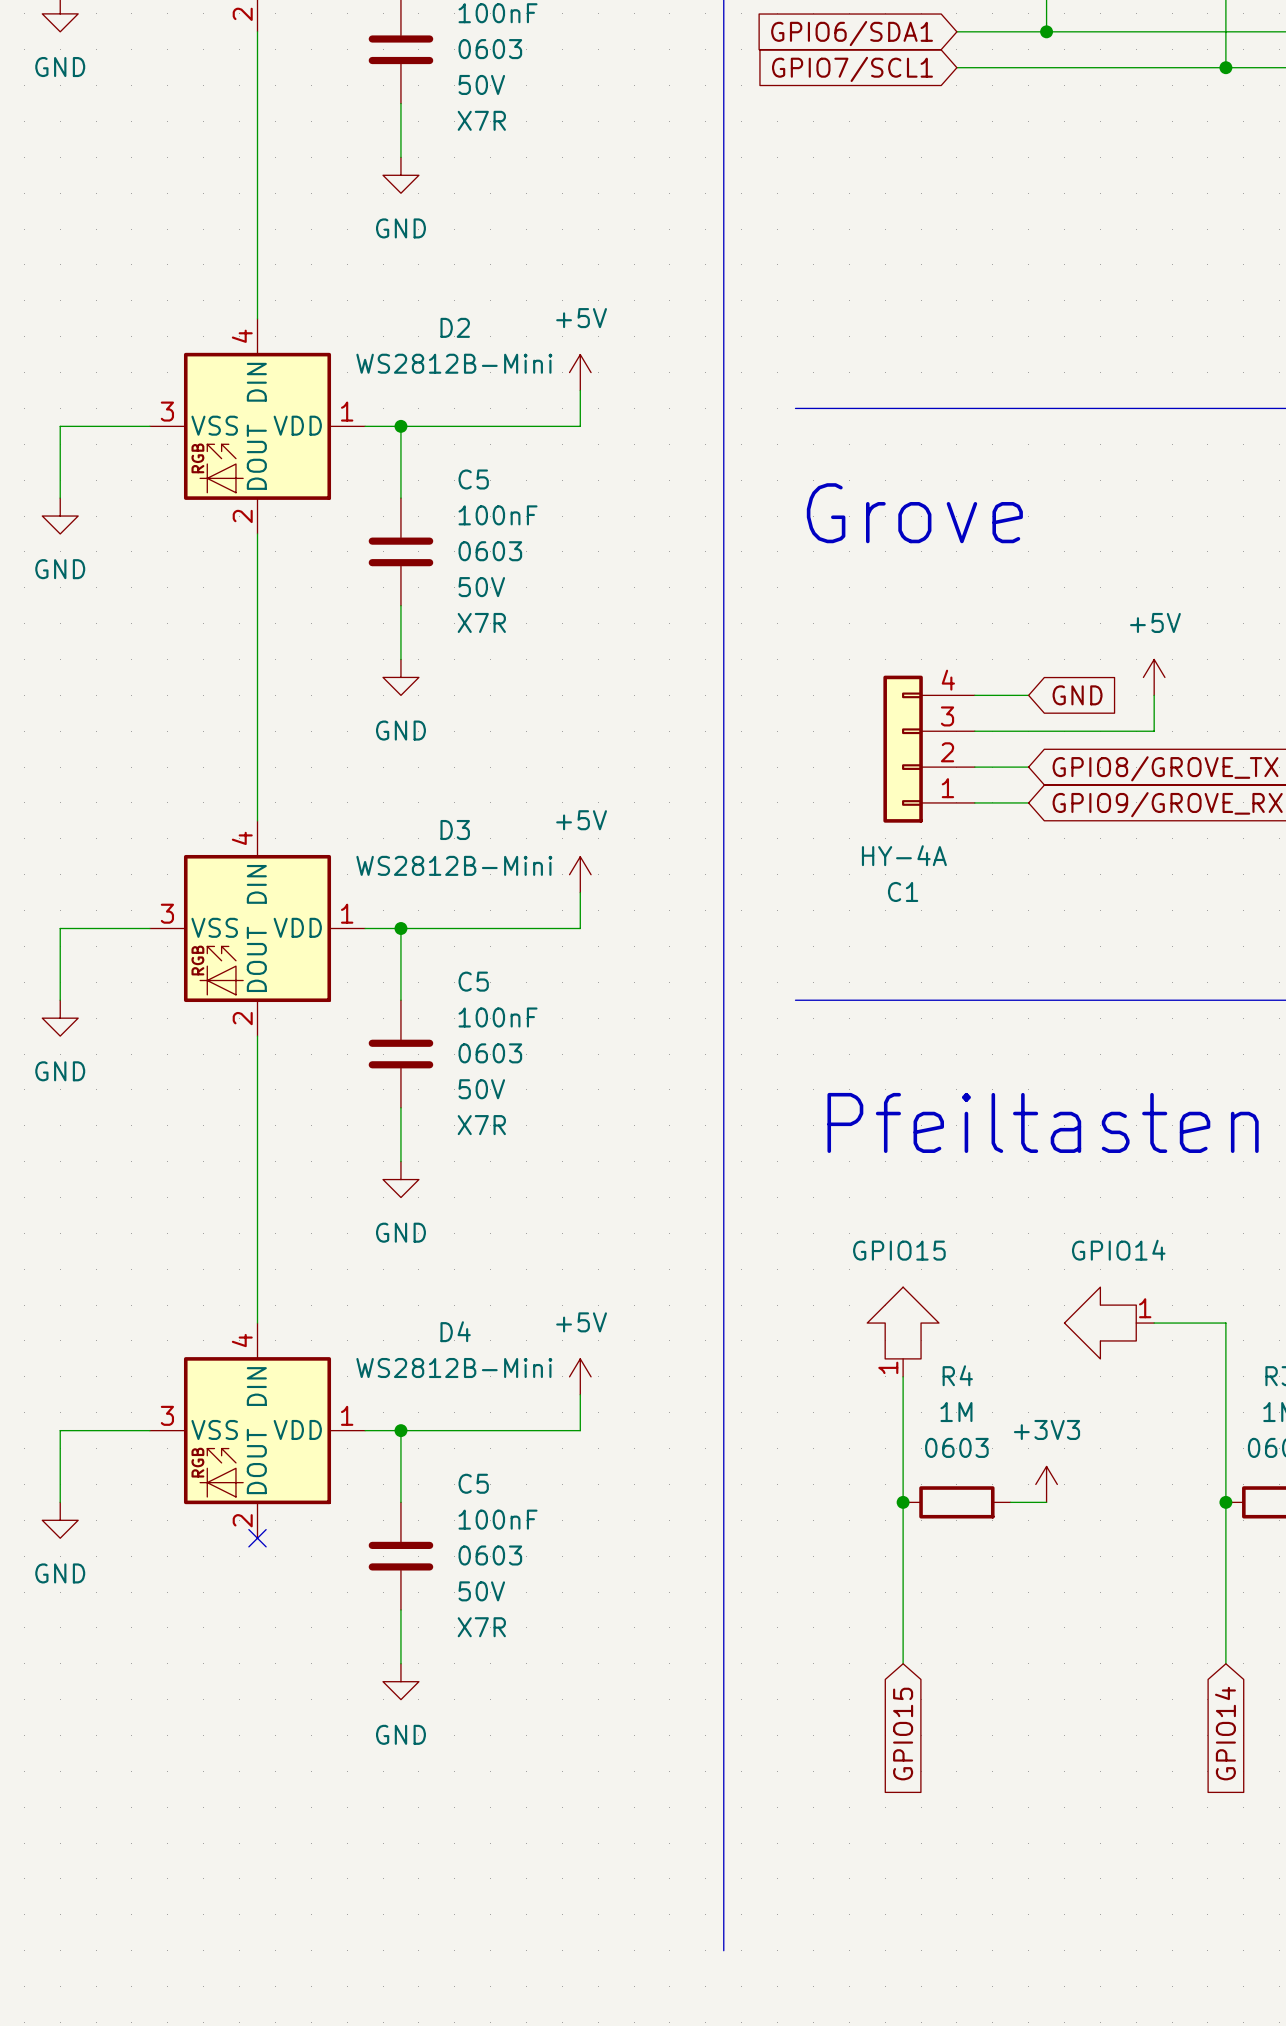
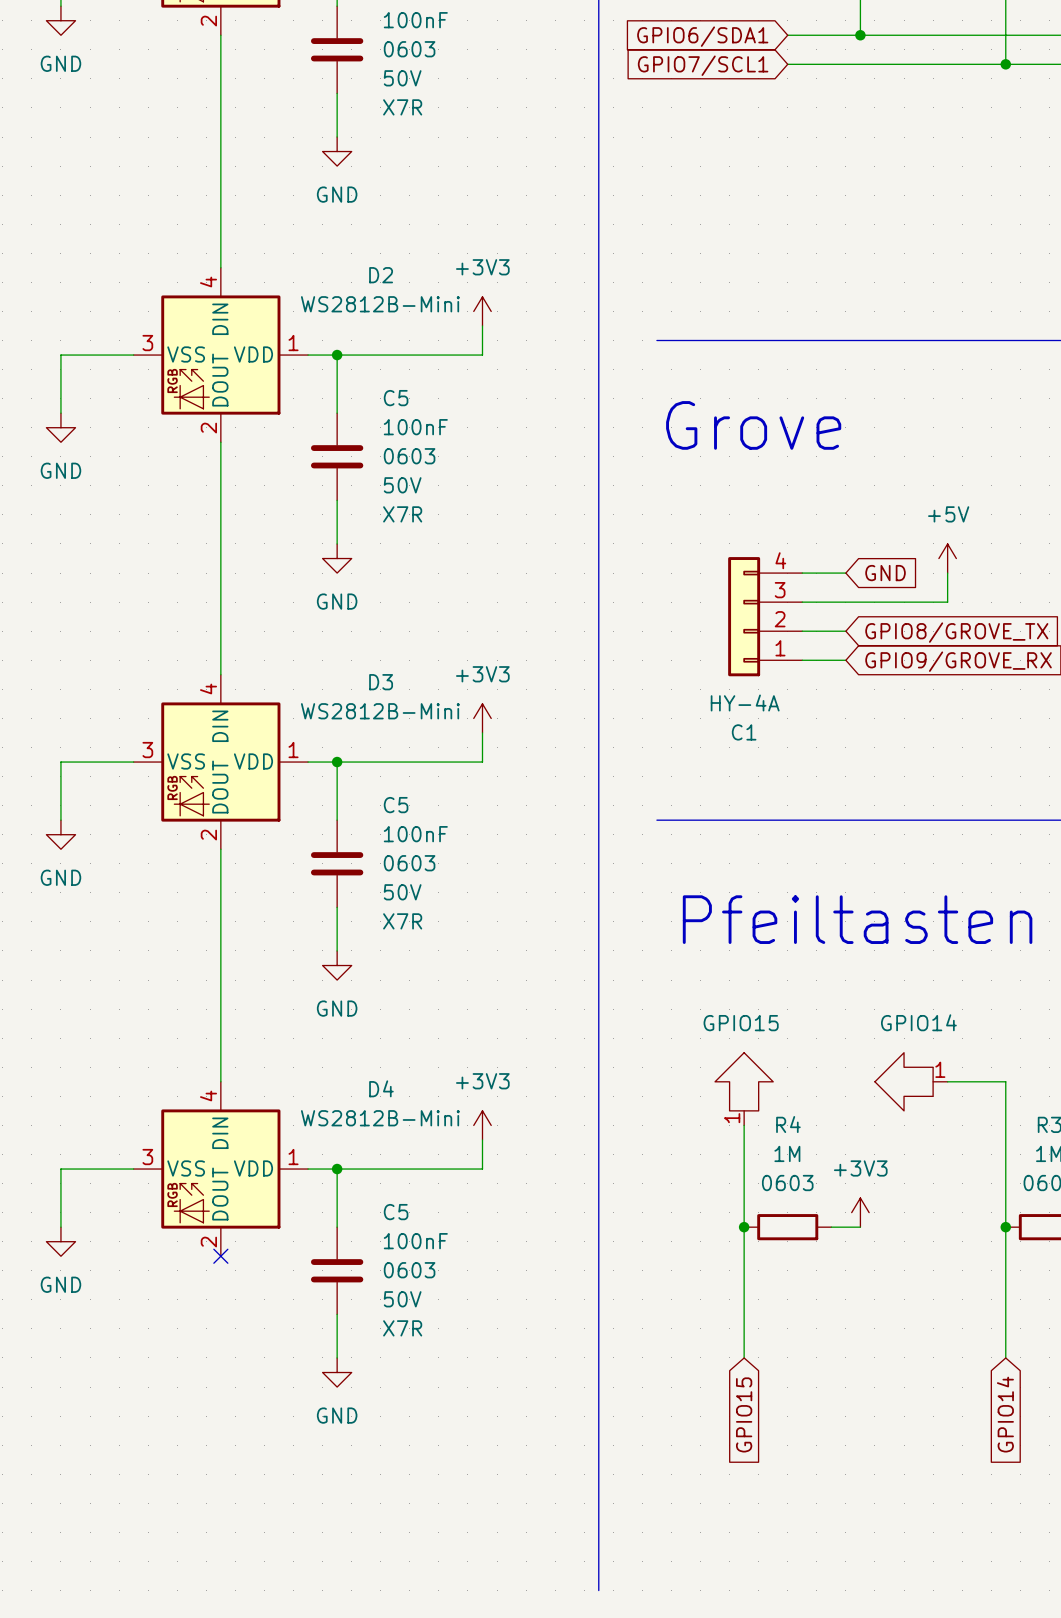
power symbol: +5V (580, 372) -> +3V3 (482, 311)
power symbol: +5V (580, 874) -> +3V3 (482, 718)
power symbol: +5V (580, 1376) -> +3V3 (482, 1125)

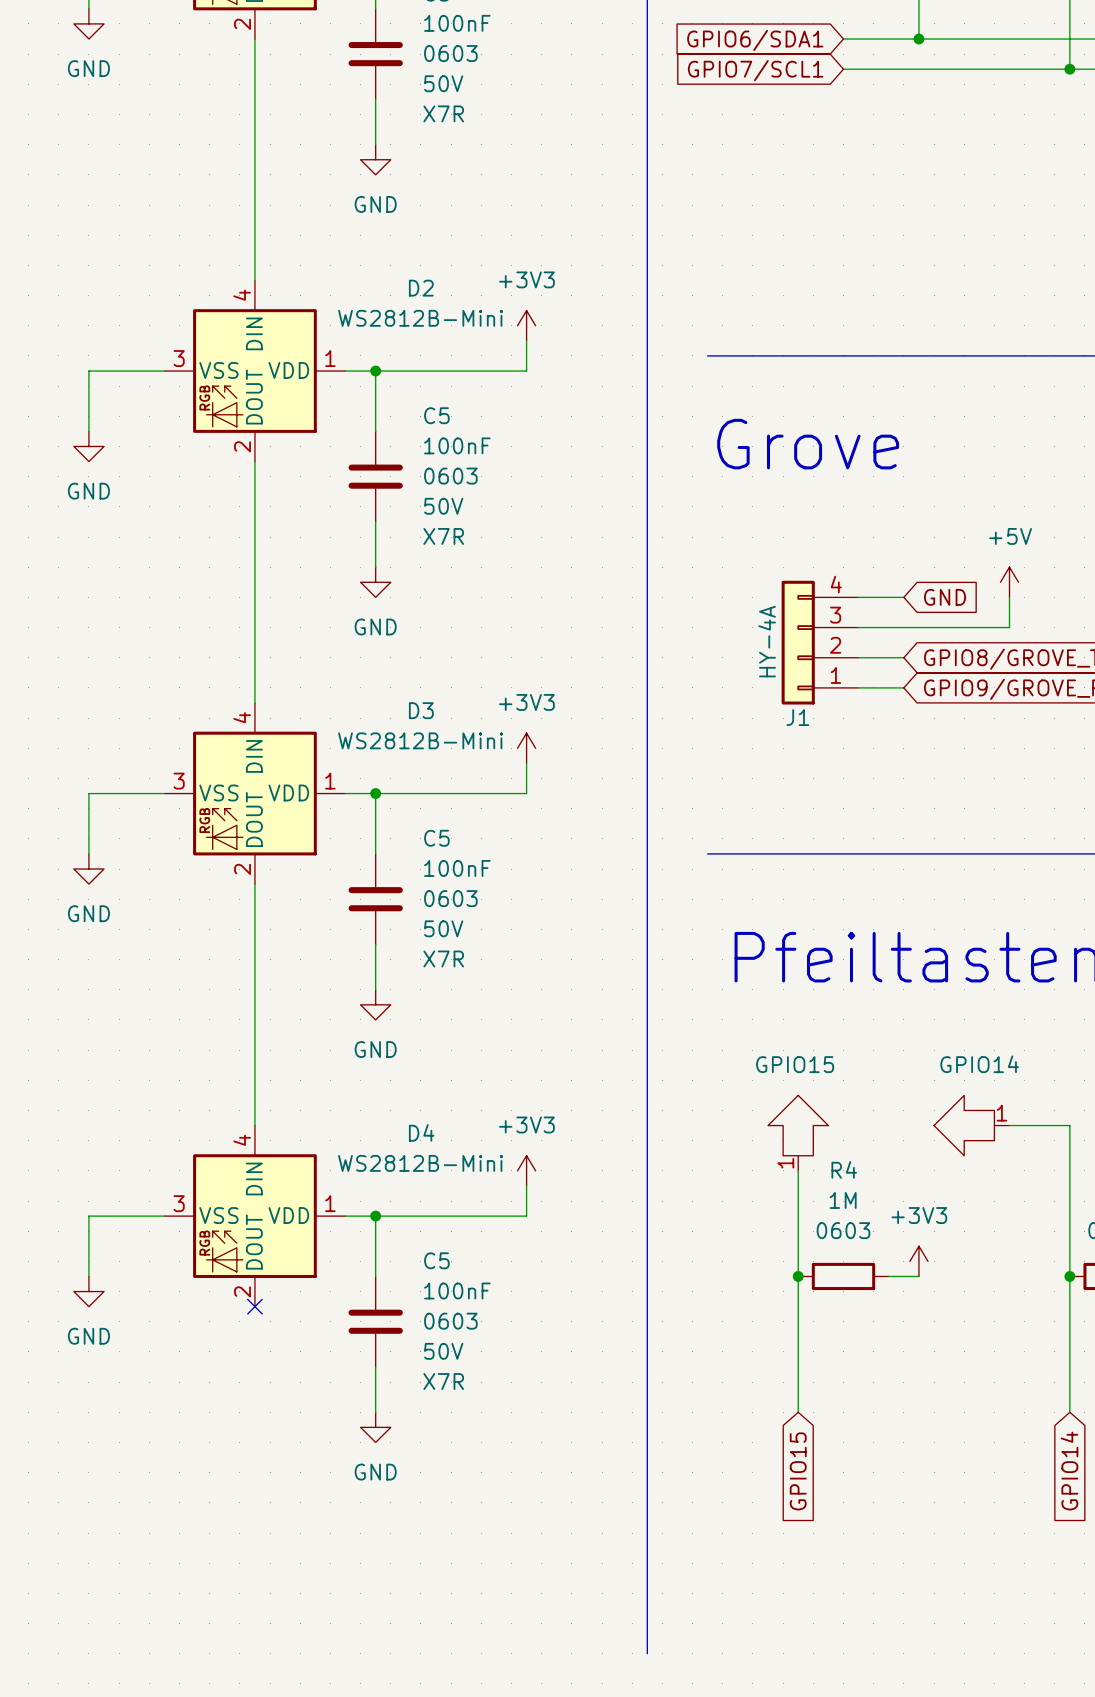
C1 value rotation: 0° (745, 703) -> 90° counterclockwise (767, 641)
C1 value position: HY-4A (745, 703) -> HY-4A (767, 641)
C1 name: C1 (744, 732) -> J1 (797, 717)

